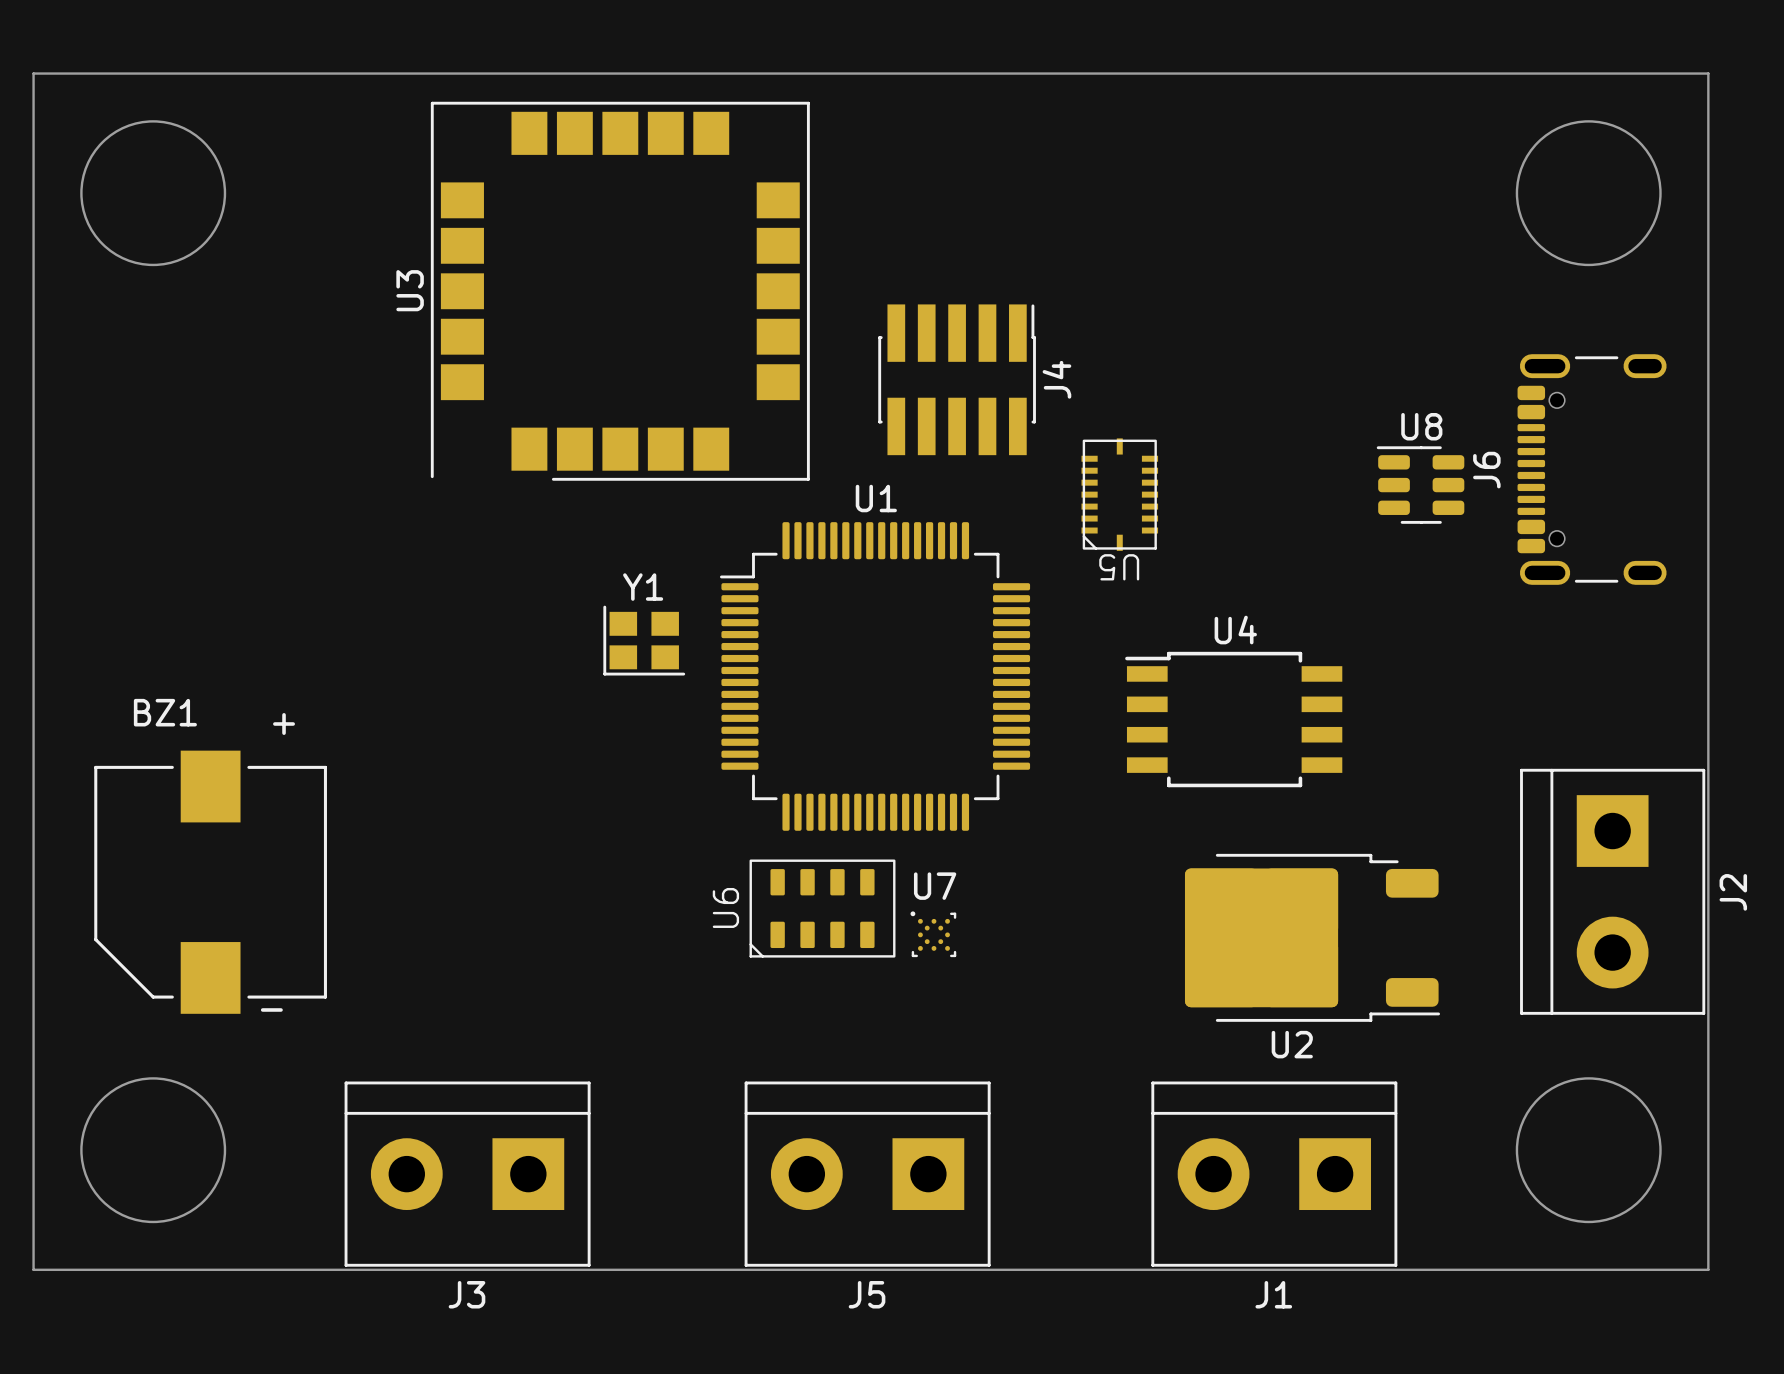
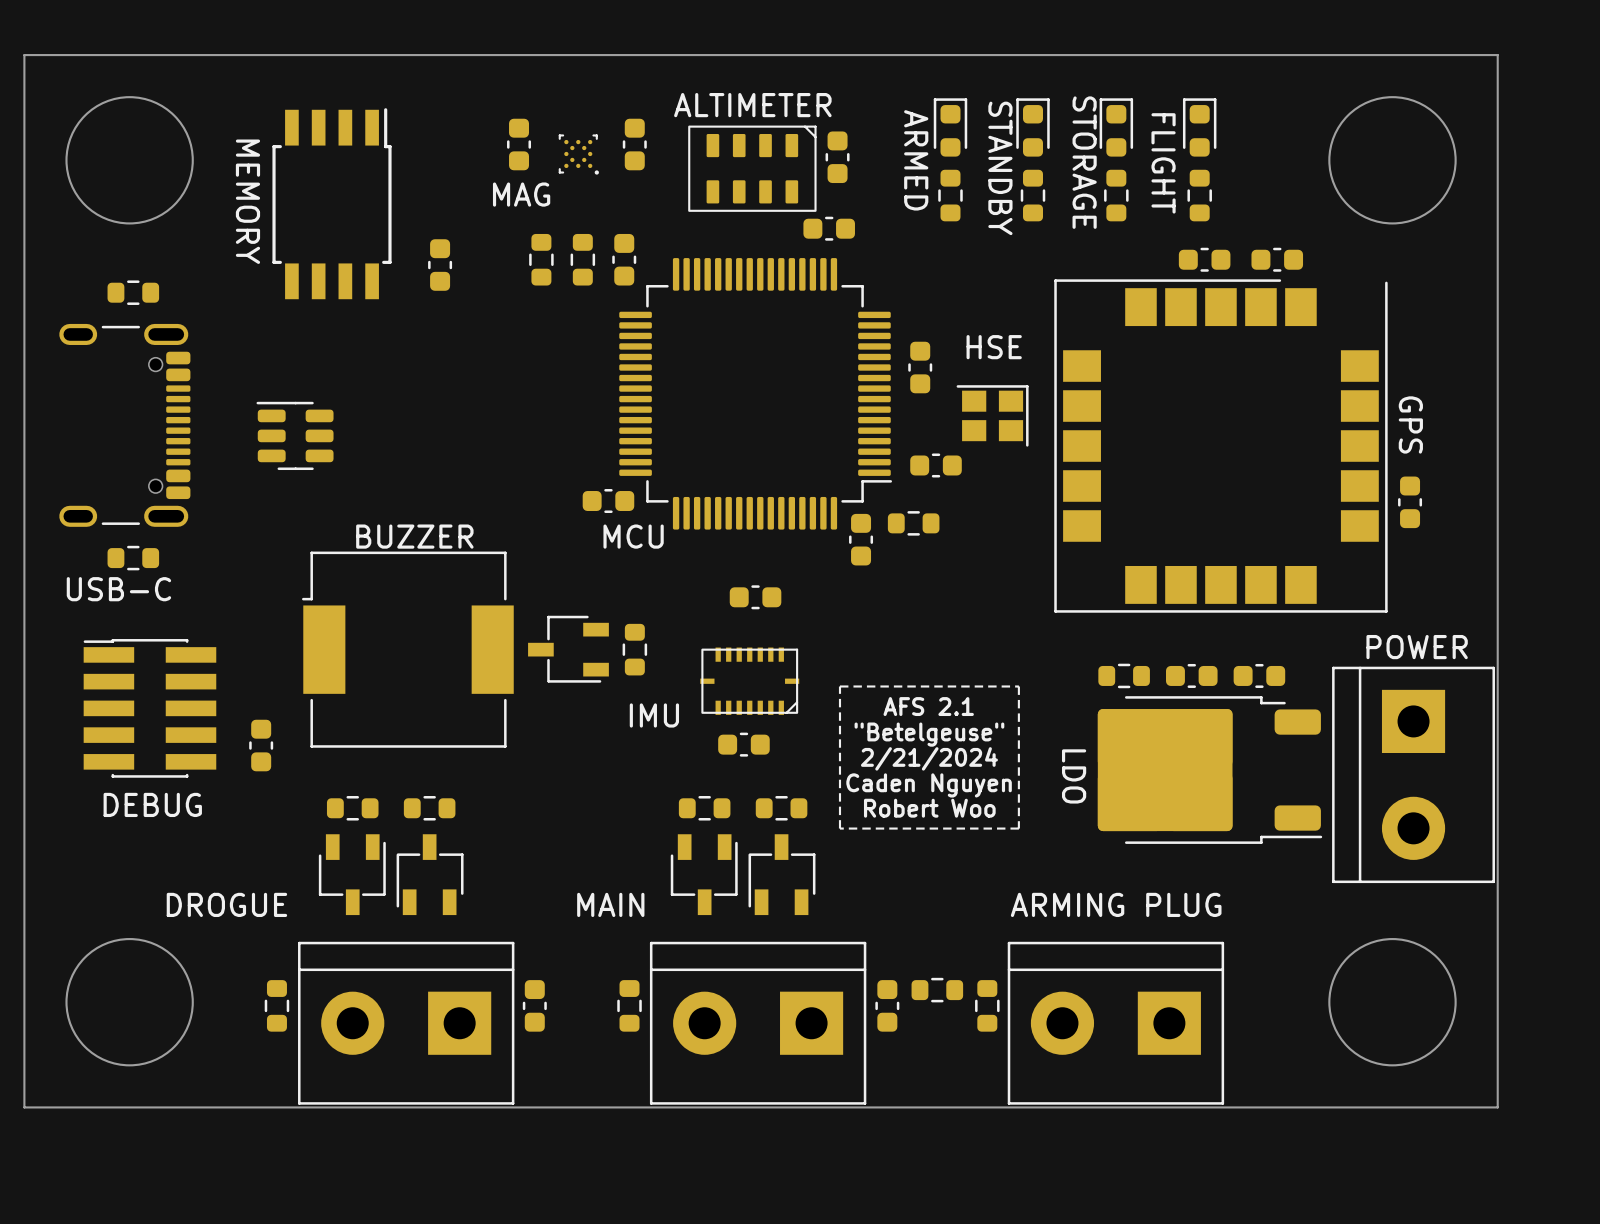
text: none -> ALTIMETER (752, 105)
part: none -> (950, 127)
part: none -> (1032, 127)
part: none -> (1116, 127)
part: none -> (1199, 127)
part: none -> (519, 144)
part: none -> (634, 144)
part: none -> (578, 154)
part: none -> (837, 157)
text: none -> ARMED (916, 160)
text: none -> STORAGE (1084, 162)
text: none -> FLIGHT (1163, 163)
part: none -> (752, 168)
text: none -> STANDBY (1000, 168)
text: none -> MAG (521, 194)
part: none -> (950, 195)
part: none -> (1032, 195)
part: none -> (1116, 195)
part: none -> (1199, 195)
text: none -> MEMORY (247, 201)
part: none -> (332, 203)
part: none -> (829, 228)
U3: (620, 291) -> none
part: none -> (541, 259)
part: none -> (582, 259)
part: none -> (624, 259)
part: none -> (1204, 259)
part: none -> (1277, 259)
part: none -> (440, 265)
part: none -> (133, 292)
J4: (957, 379) -> none
text: none -> HSE (994, 347)
part: none -> (920, 367)
part: none -> (755, 393)
J6: (1592, 469) -> none
part: none -> (992, 415)
U8: (1420, 485) -> none
part: none -> (124, 425)
U5: (1119, 494) -> none
text: none -> GPS (1410, 424)
part: none -> (295, 435)
part: none -> (1220, 446)
part: none -> (936, 465)
part: none -> (608, 501)
part: none -> (1410, 502)
part: none -> (913, 523)
text: none -> BUZZER (414, 536)
text: none -> MCU (633, 536)
part: none -> (861, 539)
Y1: (644, 640) -> none
part: none -> (133, 558)
U1: (875, 676) -> none
text: none -> USB-C (118, 589)
part: none -> (755, 597)
U4: (1233, 719) -> none
text: none -> POWER (1417, 647)
part: none -> (568, 649)
part: none -> (407, 649)
part: none -> (634, 649)
part: none -> (1124, 675)
part: none -> (1191, 675)
part: none -> (1259, 675)
part: none -> (749, 681)
line: none -> (839, 686) (1018, 686) (1018, 828) (839, 828) (839, 686)
text: none -> AFS 2.1 (928, 706)
part: none -> (149, 708)
text: none -> IMU (654, 715)
text: none -> "Betelgeuse" (929, 734)
part: none -> (743, 744)
part: none -> (261, 745)
text: none -> 2/21/2024 (929, 758)
BZ1: (210, 882) -> none
part: none -> (1210, 770)
J2 name: J2 (1733, 892) -> none
text: none -> LDO (1074, 776)
text: none -> Caden Nguyen (929, 785)
U6: (822, 908) -> none
text: none -> DEBUG (152, 804)
part: none -> (352, 808)
part: none -> (429, 808)
part: none -> (704, 808)
part: none -> (781, 808)
text: none -> Robert Woo (929, 808)
U7: (933, 934) -> none
U2: (1312, 937) -> none
part: none -> (352, 874)
part: none -> (430, 874)
part: none -> (704, 874)
part: none -> (781, 874)
text: none -> DROGUE (226, 904)
text: none -> MAIN (610, 904)
text: none -> ARMING PLUG (1116, 904)
part: none -> (937, 990)
part: none -> (276, 1005)
part: none -> (534, 1005)
part: none -> (629, 1005)
part: none -> (887, 1005)
part: none -> (987, 1005)
J3 name: J3 (467, 1294) -> none
J5 name: J5 (867, 1294) -> none
J1 name: J1 (1273, 1294) -> none

